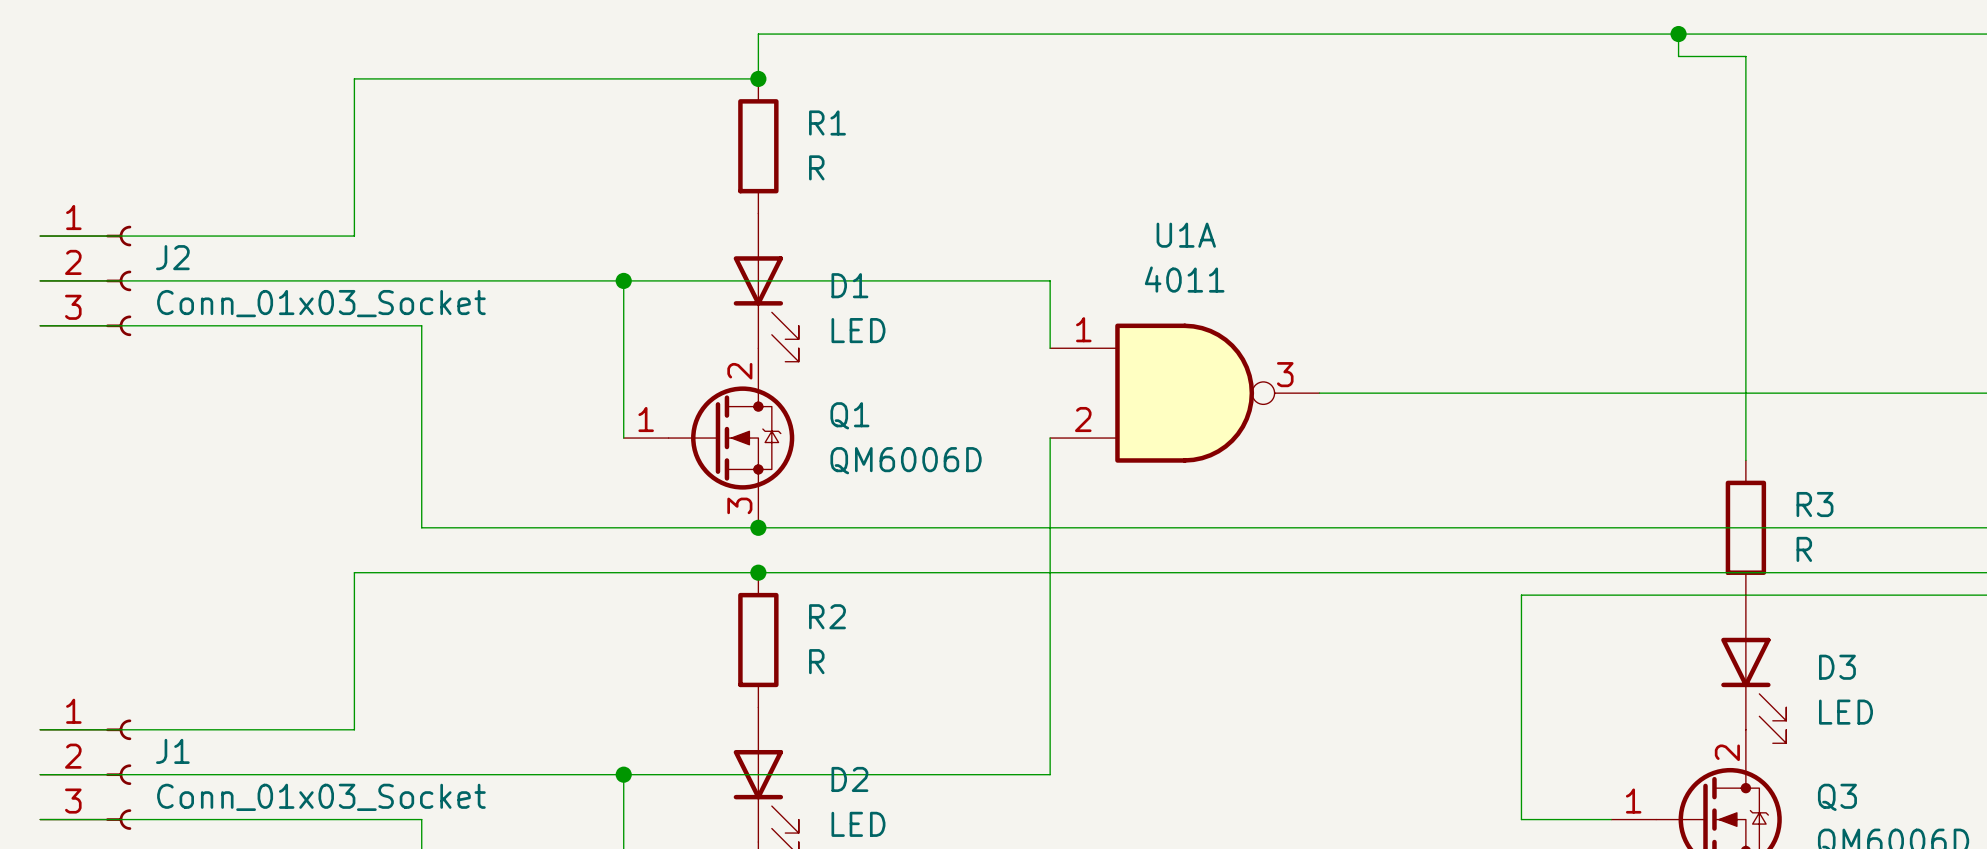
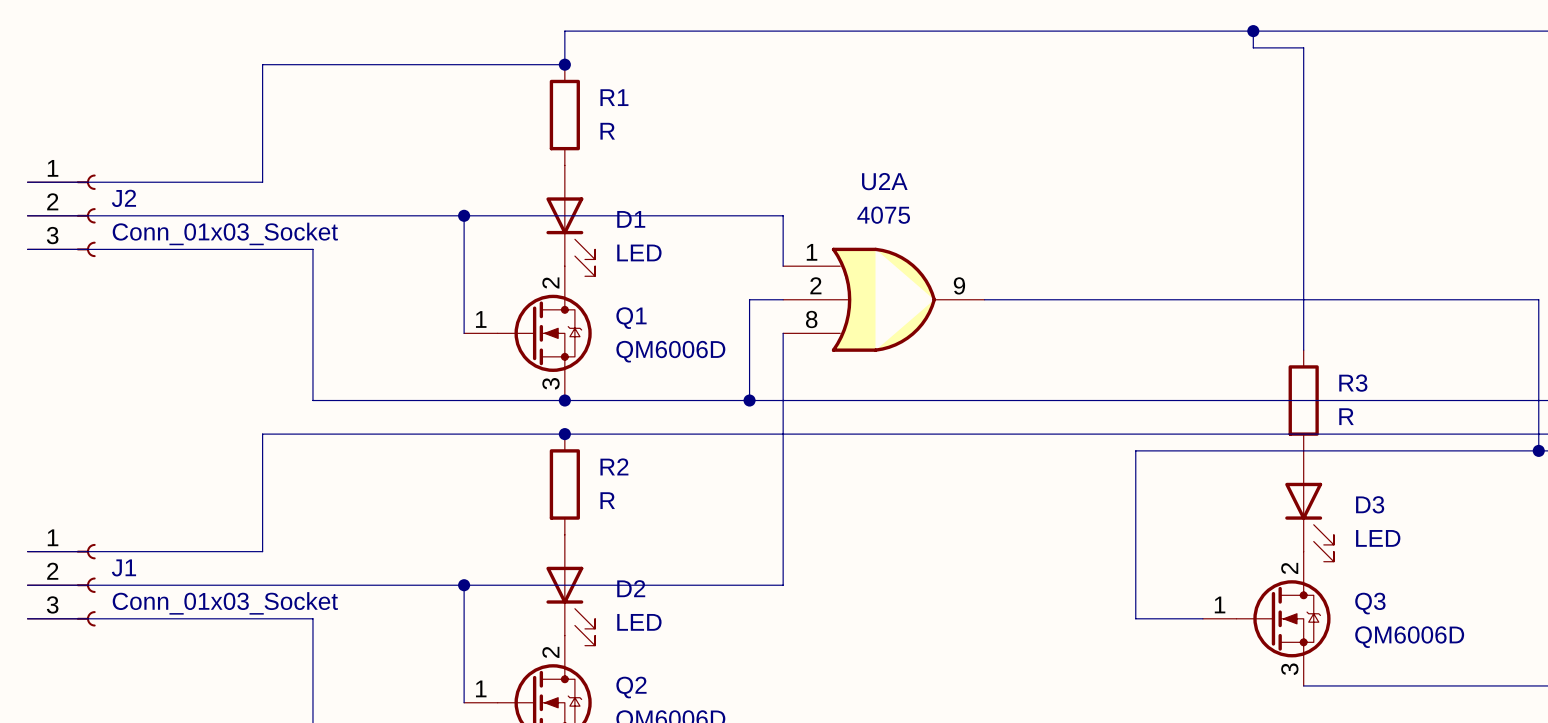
wire: none -> (783, 299) (749, 299) (749, 400)
U1A: 4011 (1184, 393) -> none
U2A: none -> 4075 (883, 299)
junction: none -> (749, 400)

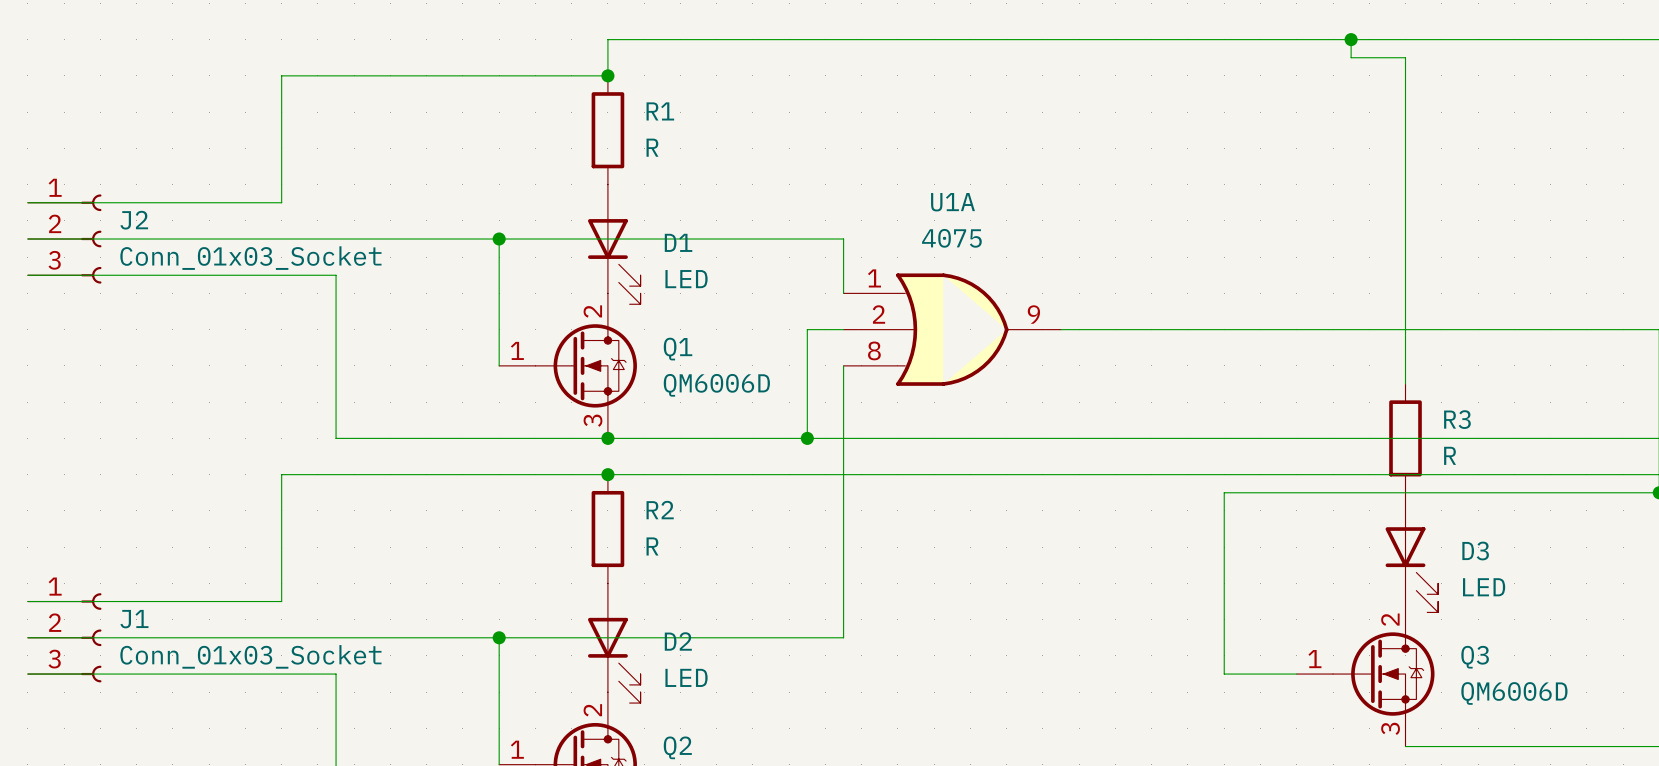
U2A name: U2A (884, 181) -> U1A (952, 202)

